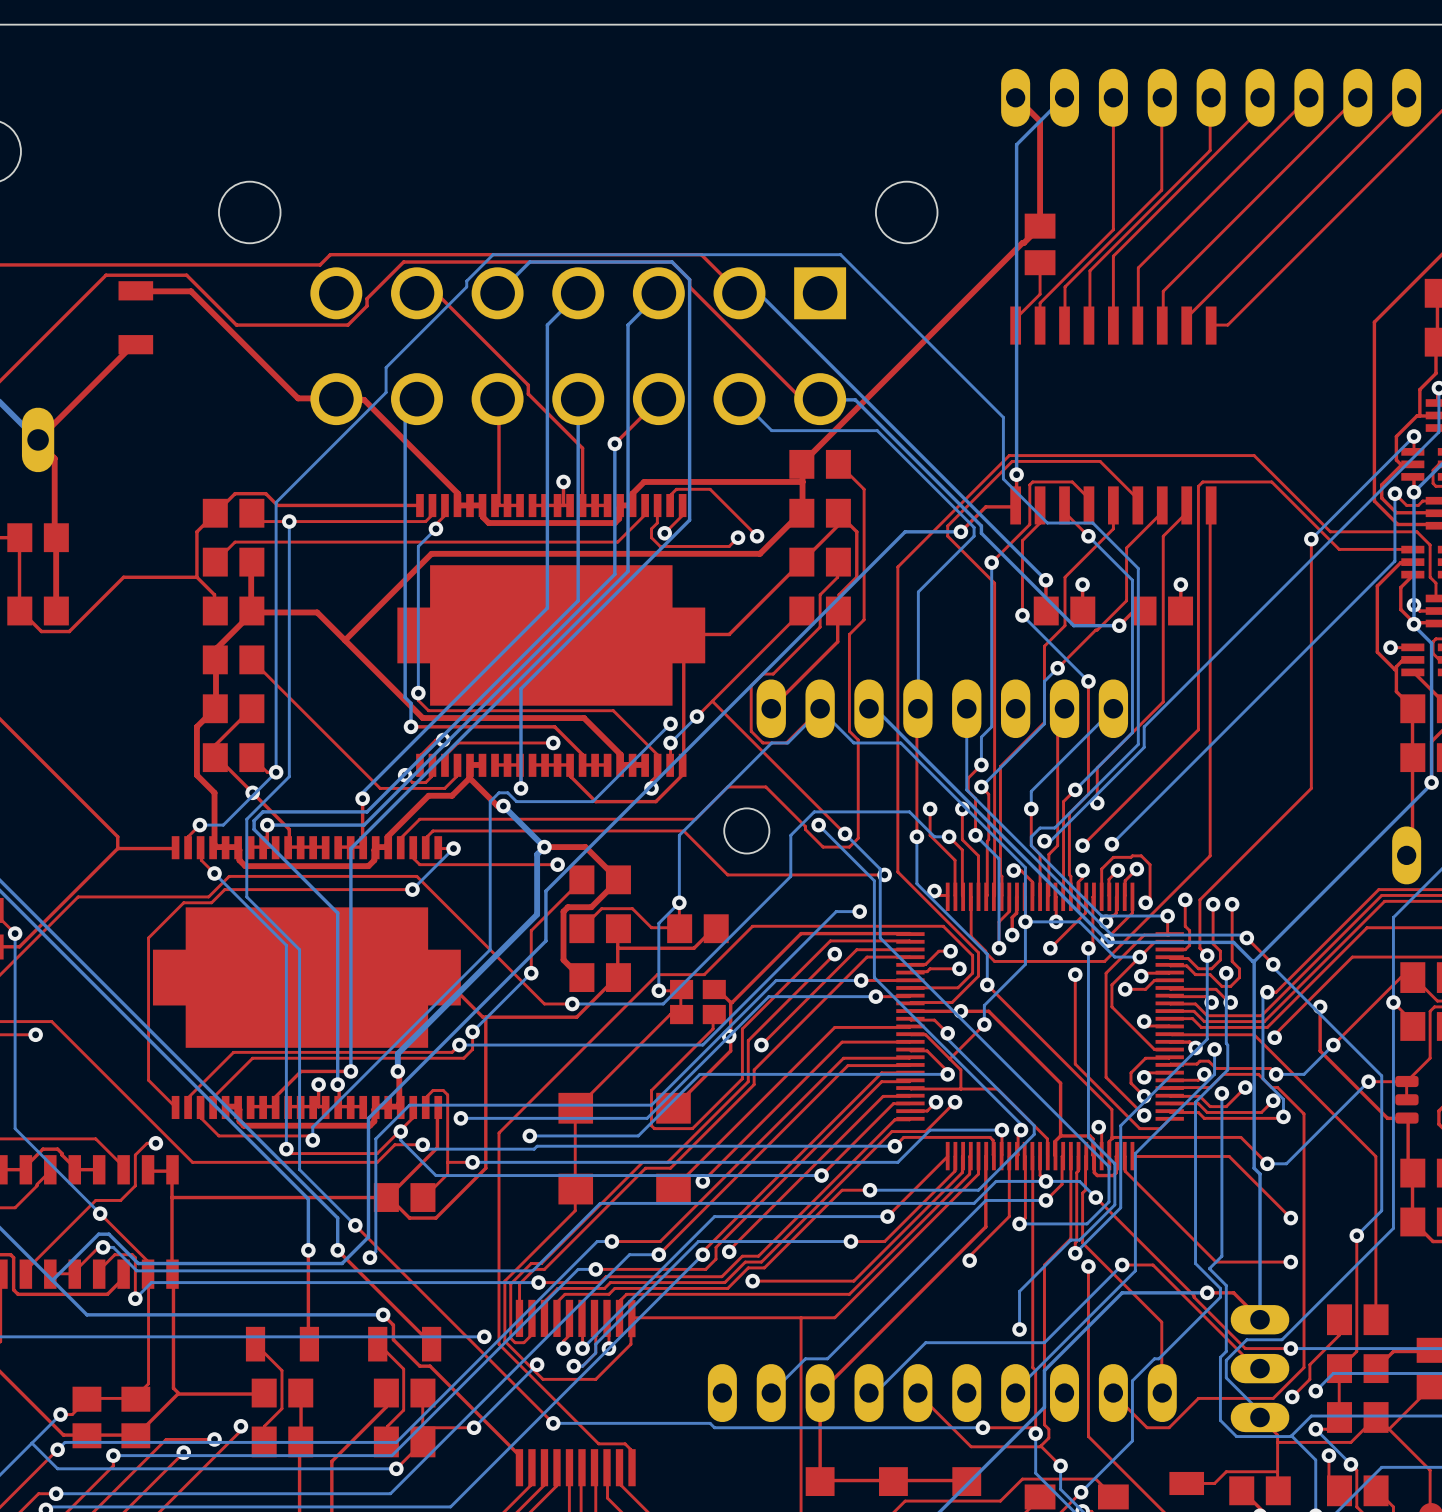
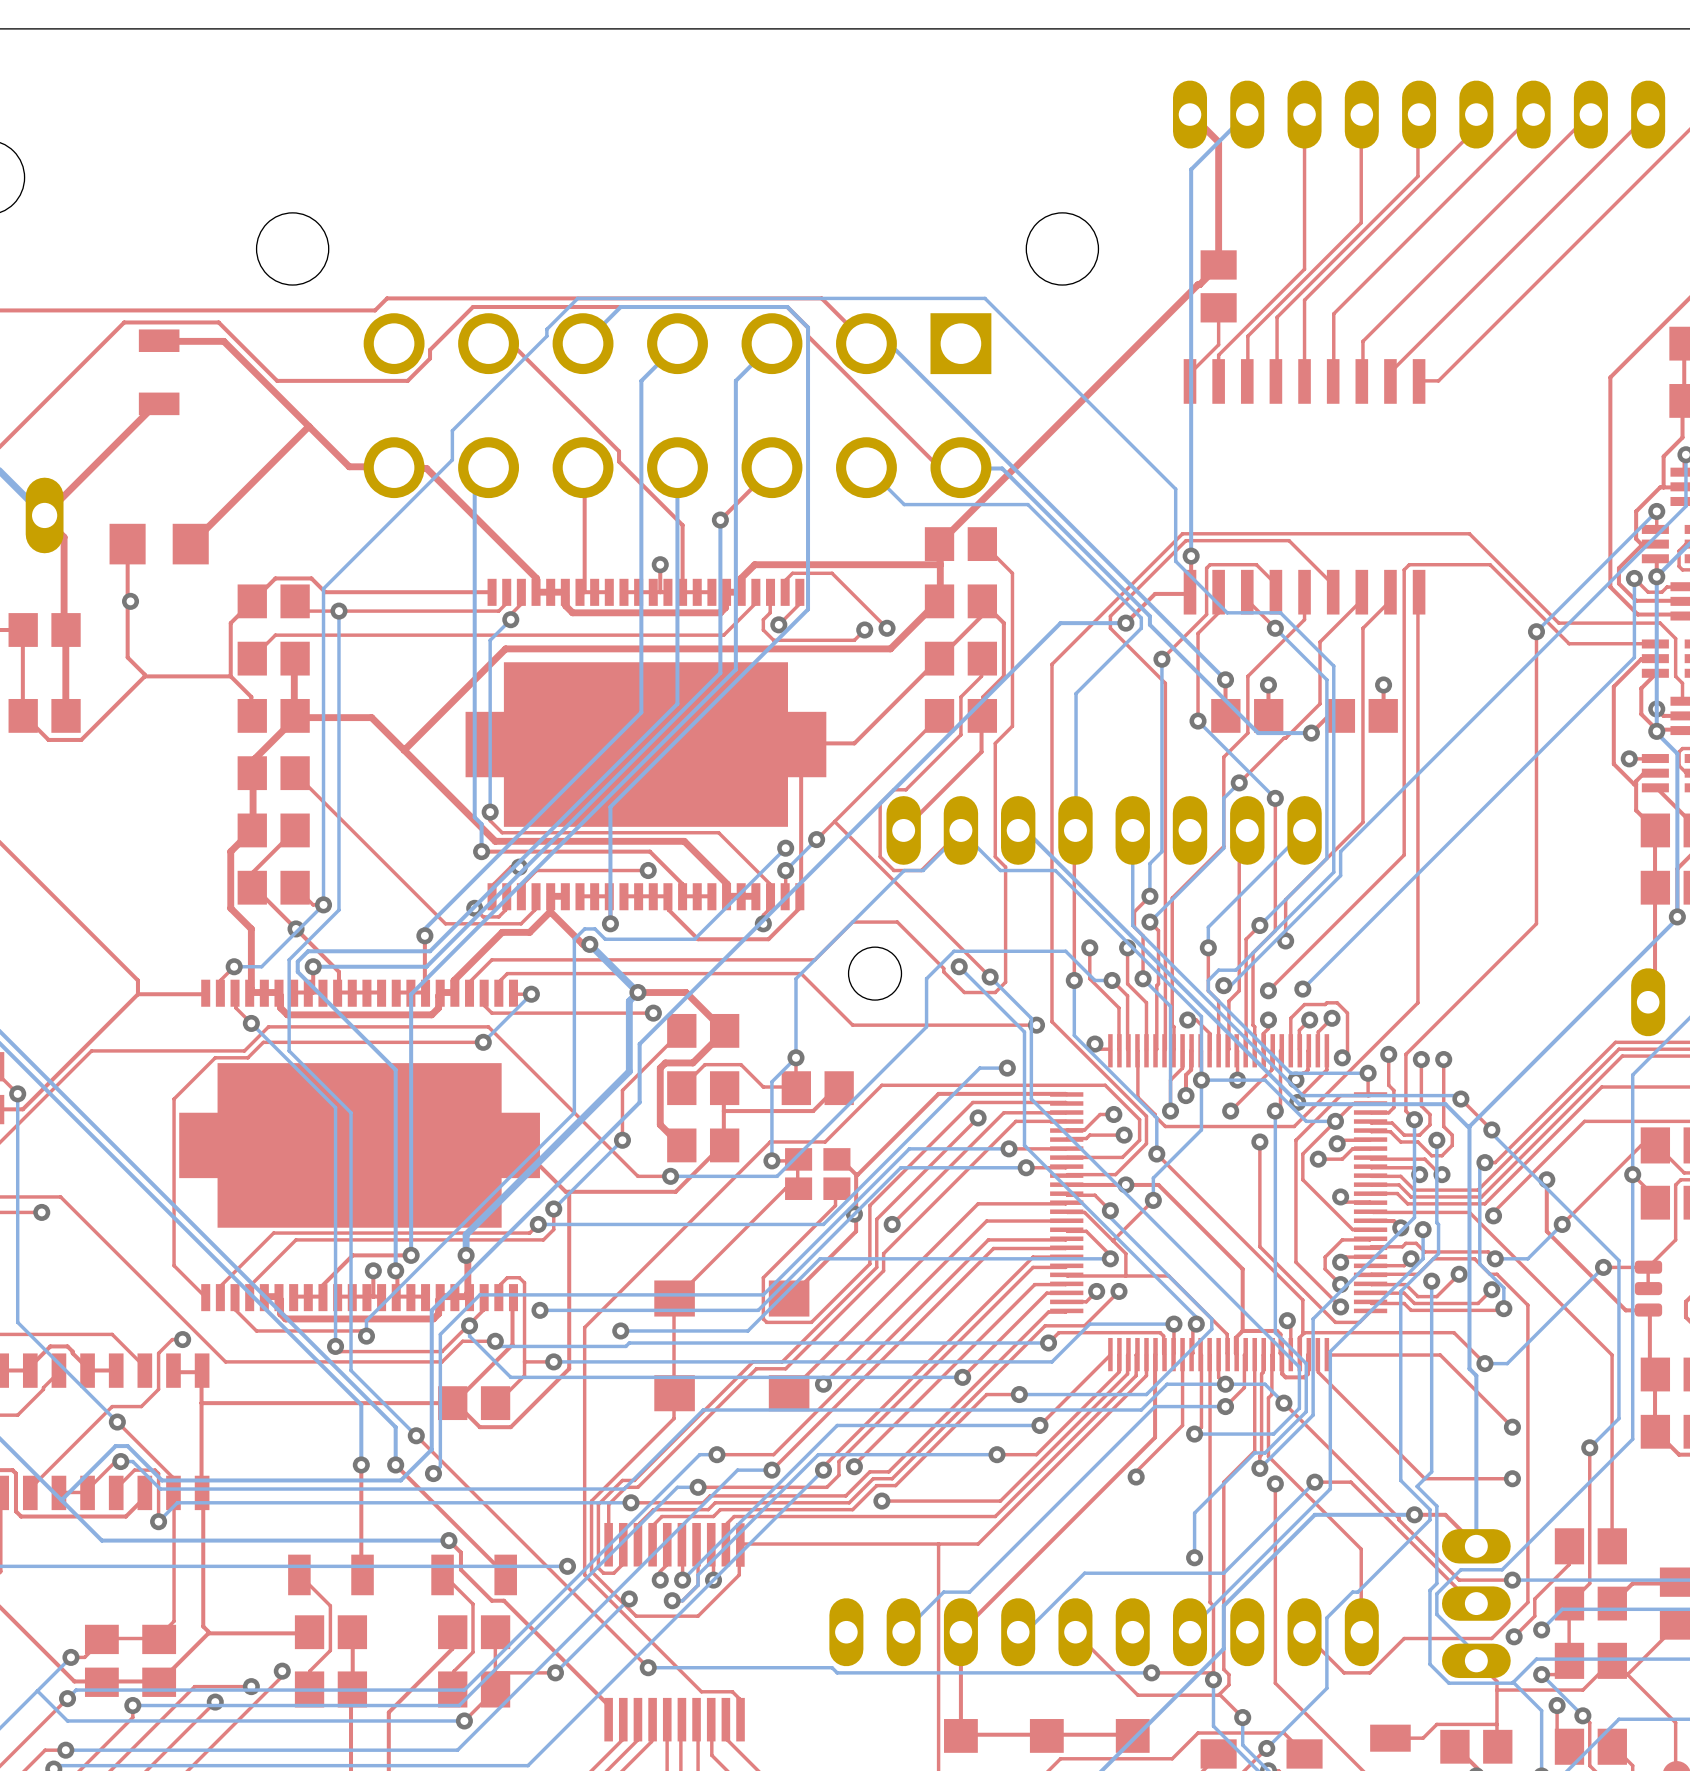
top track: none -> (308, 426) (190, 544)
top track: none -> (127, 544) (127, 657) (144, 676)
part: none -> (159, 544)
via: none -> (130, 601)

